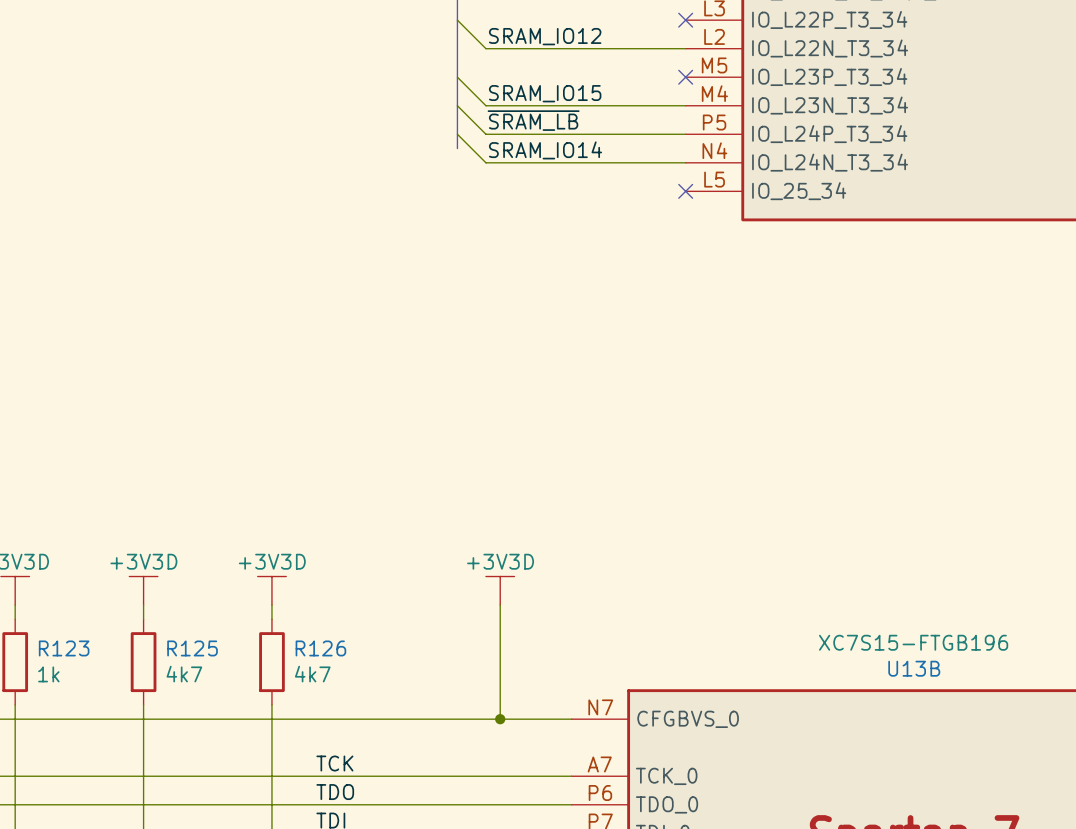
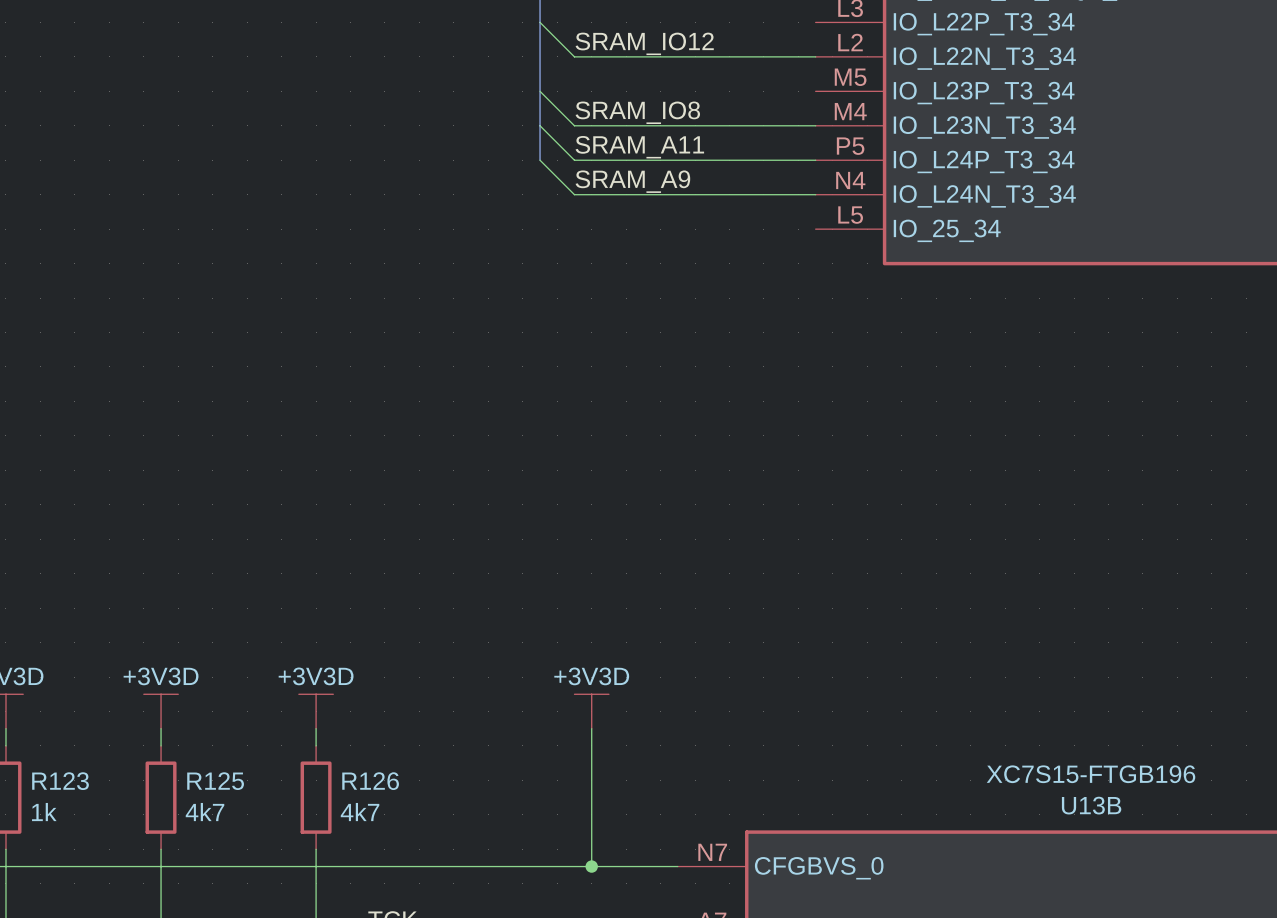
no-connect mark: (685, 20) -> none
no-connect mark: (685, 77) -> none
label: SRAM_IO15 (545, 93) -> SRAM_IO8 (637, 112)
label: ~{SRAM_LB} (533, 120) -> SRAM_A11 (639, 147)
bus: (457, 134) (457, 148) -> none
label: SRAM_IO14 (545, 150) -> SRAM_A9 (632, 181)
no-connect mark: (685, 191) -> none

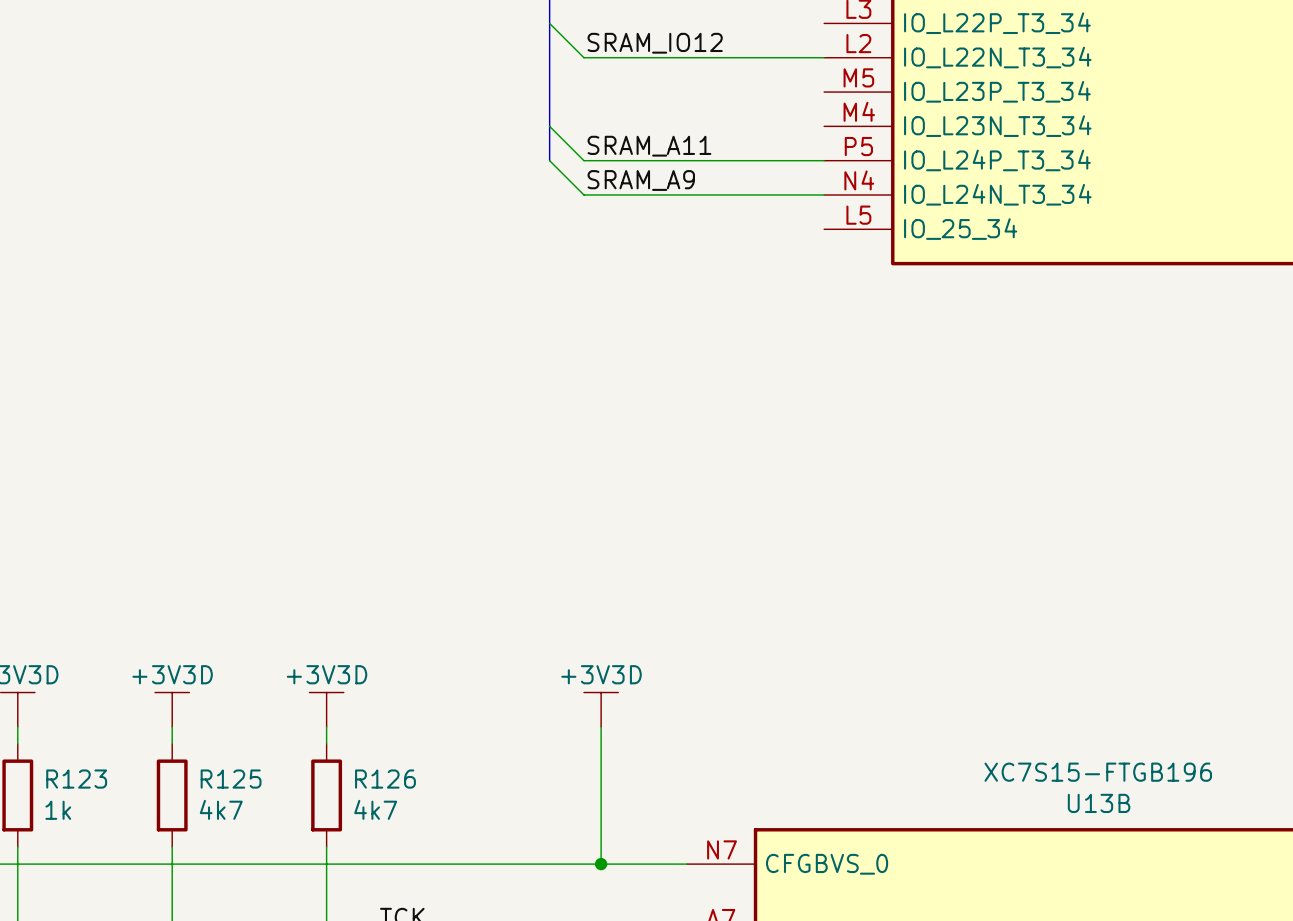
wire: (540, 91) (574, 125) (815, 125) -> none
label: SRAM_IO8 (637, 112) -> none

